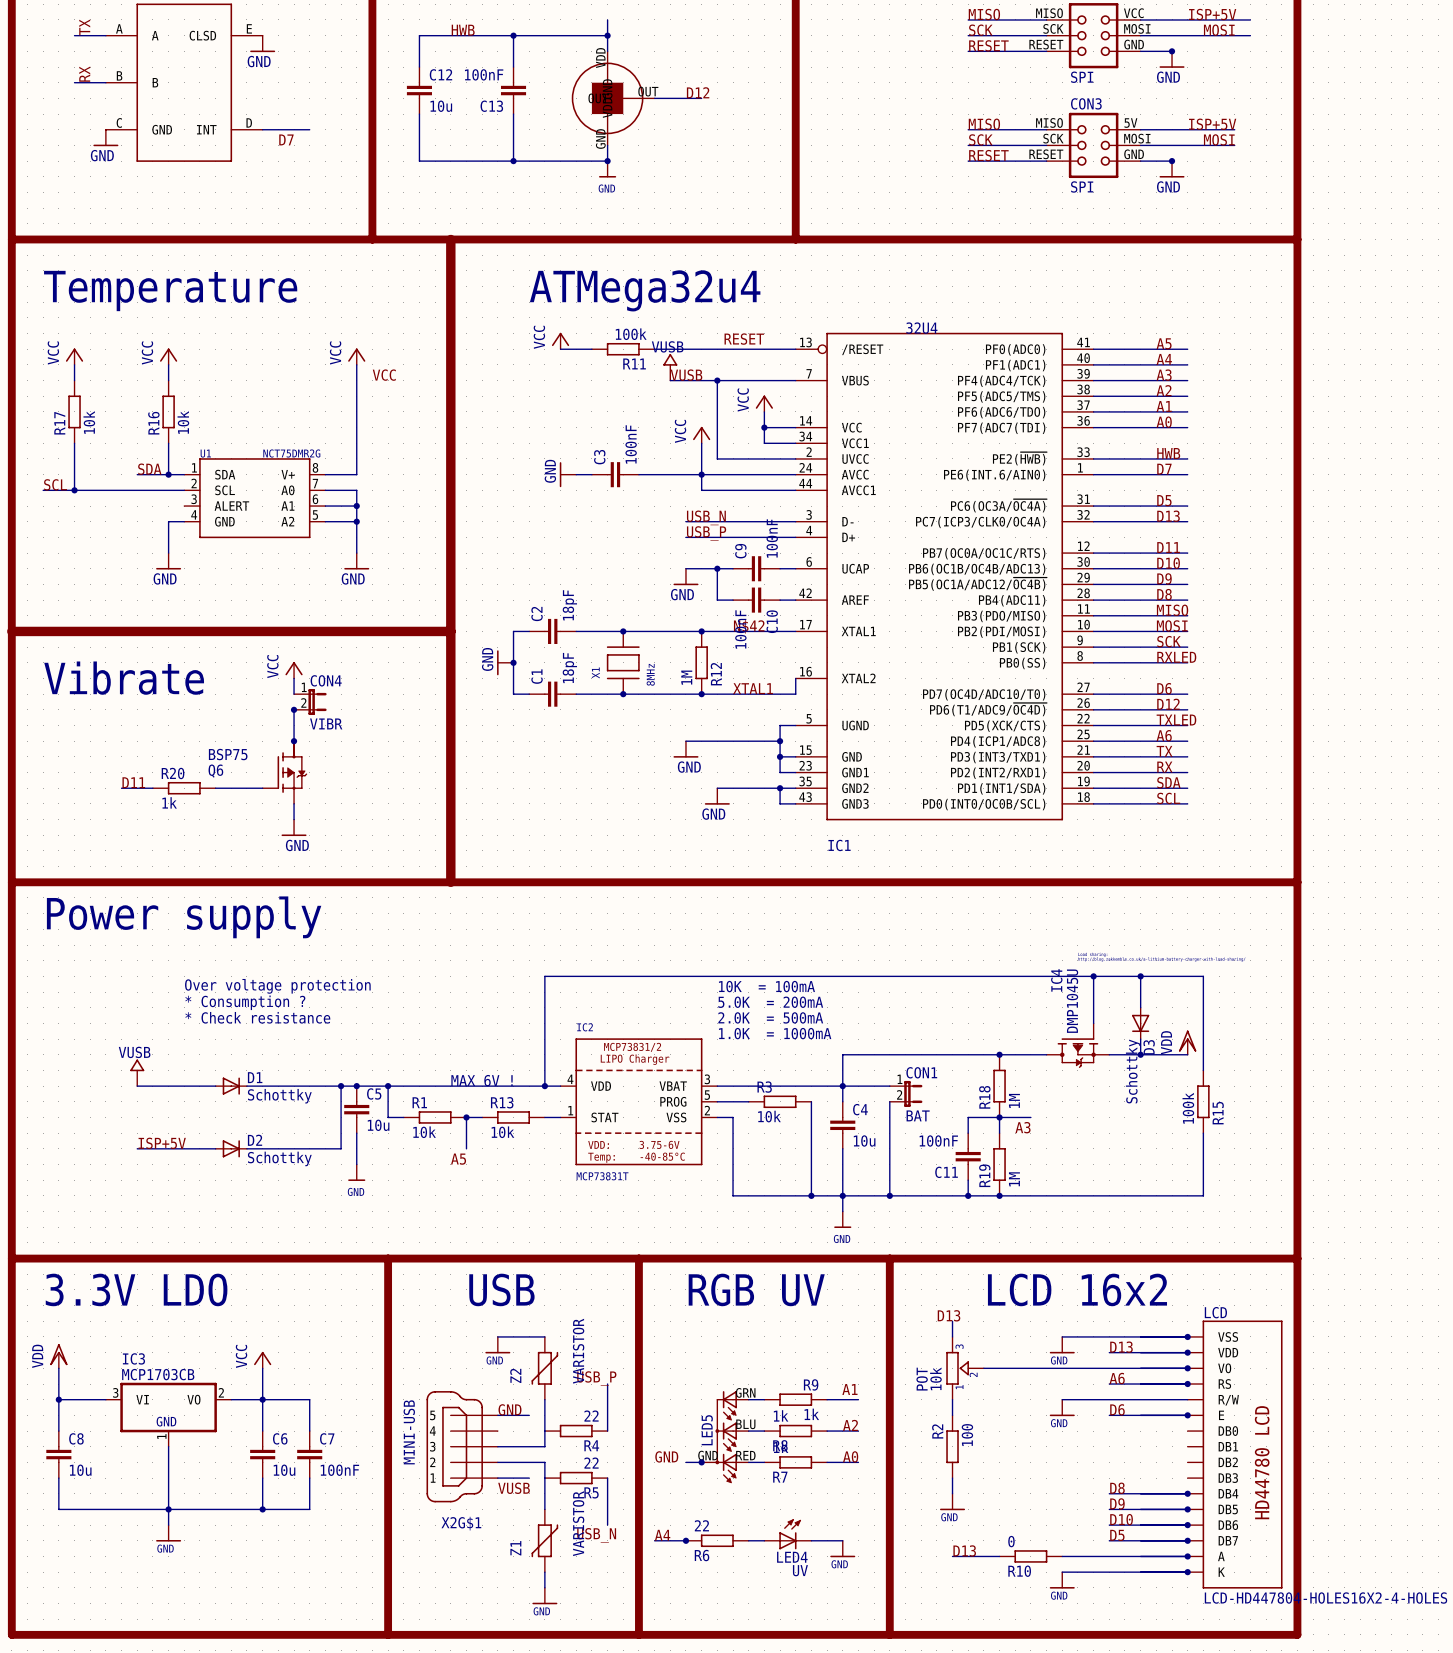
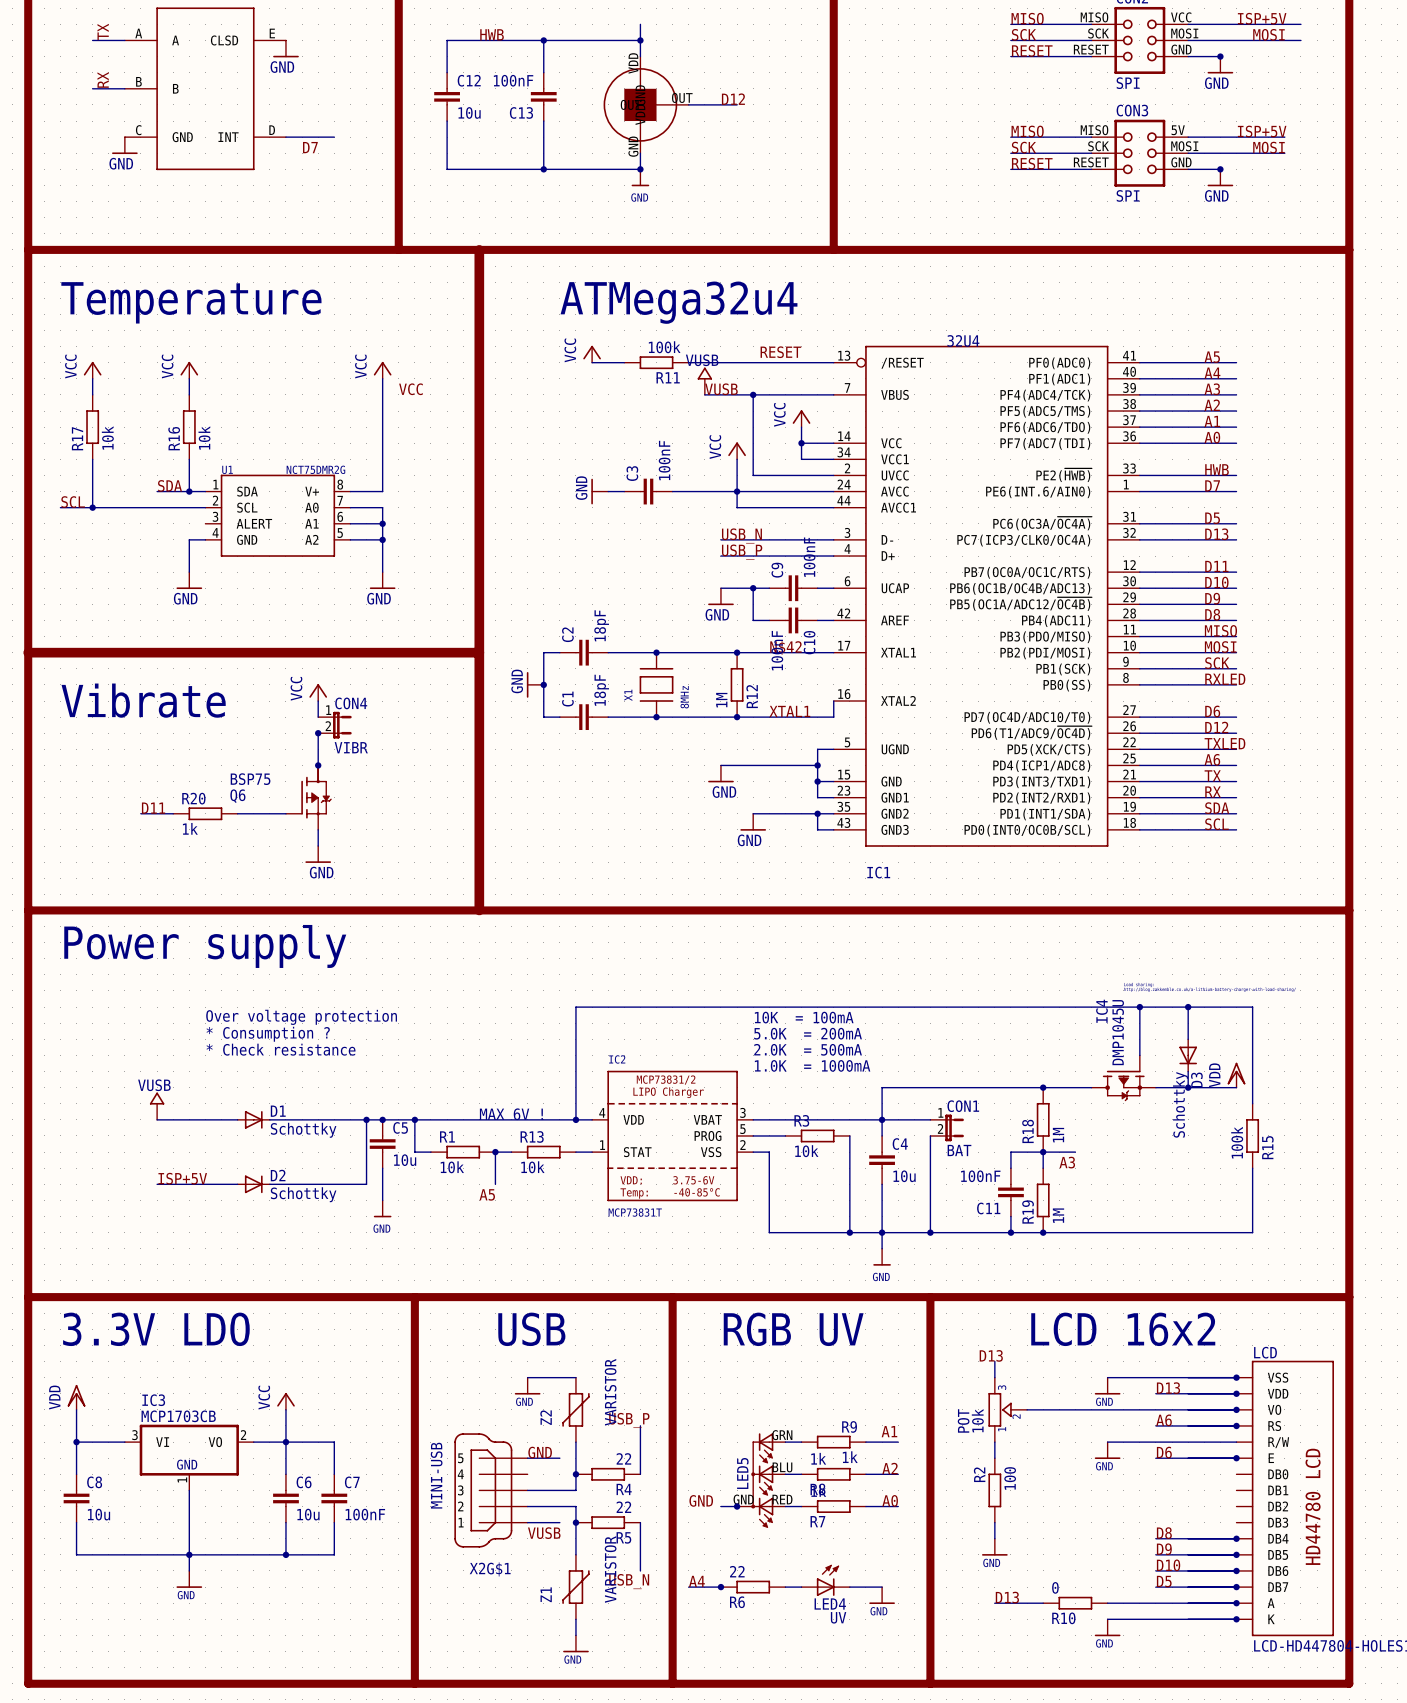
junction: none -> (575, 1474)
junction: none -> (575, 1522)

